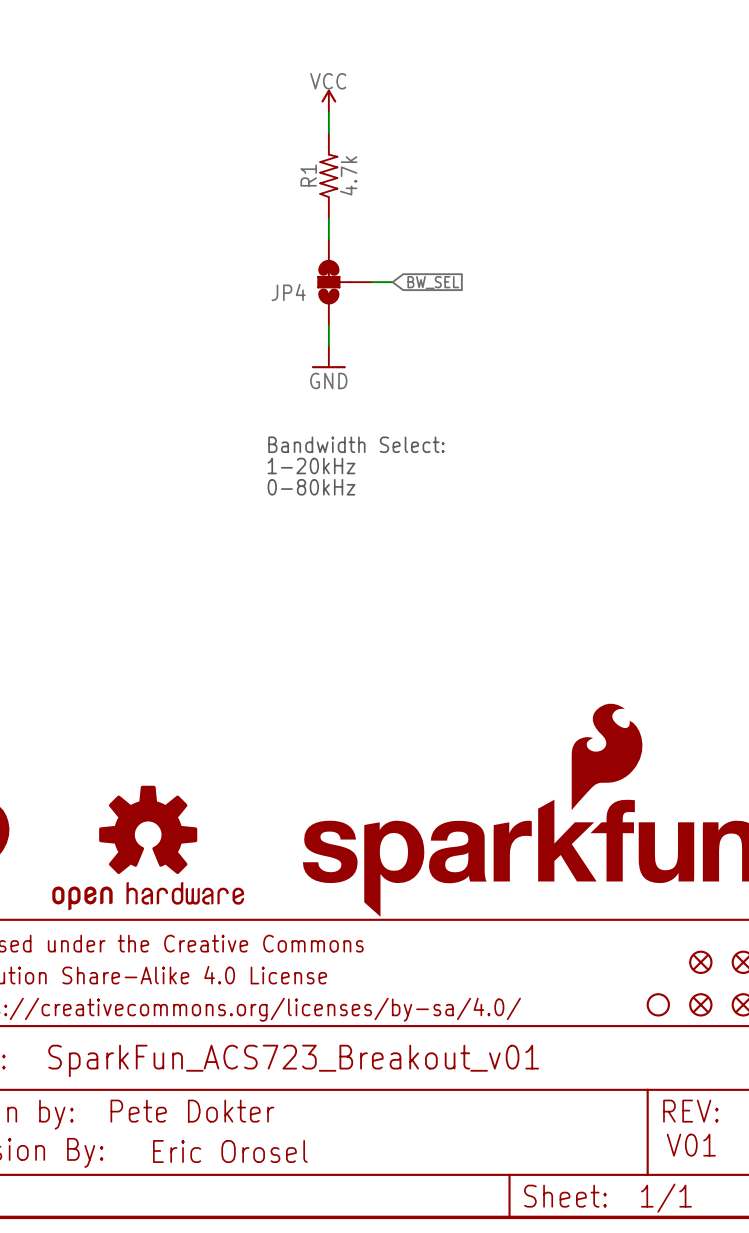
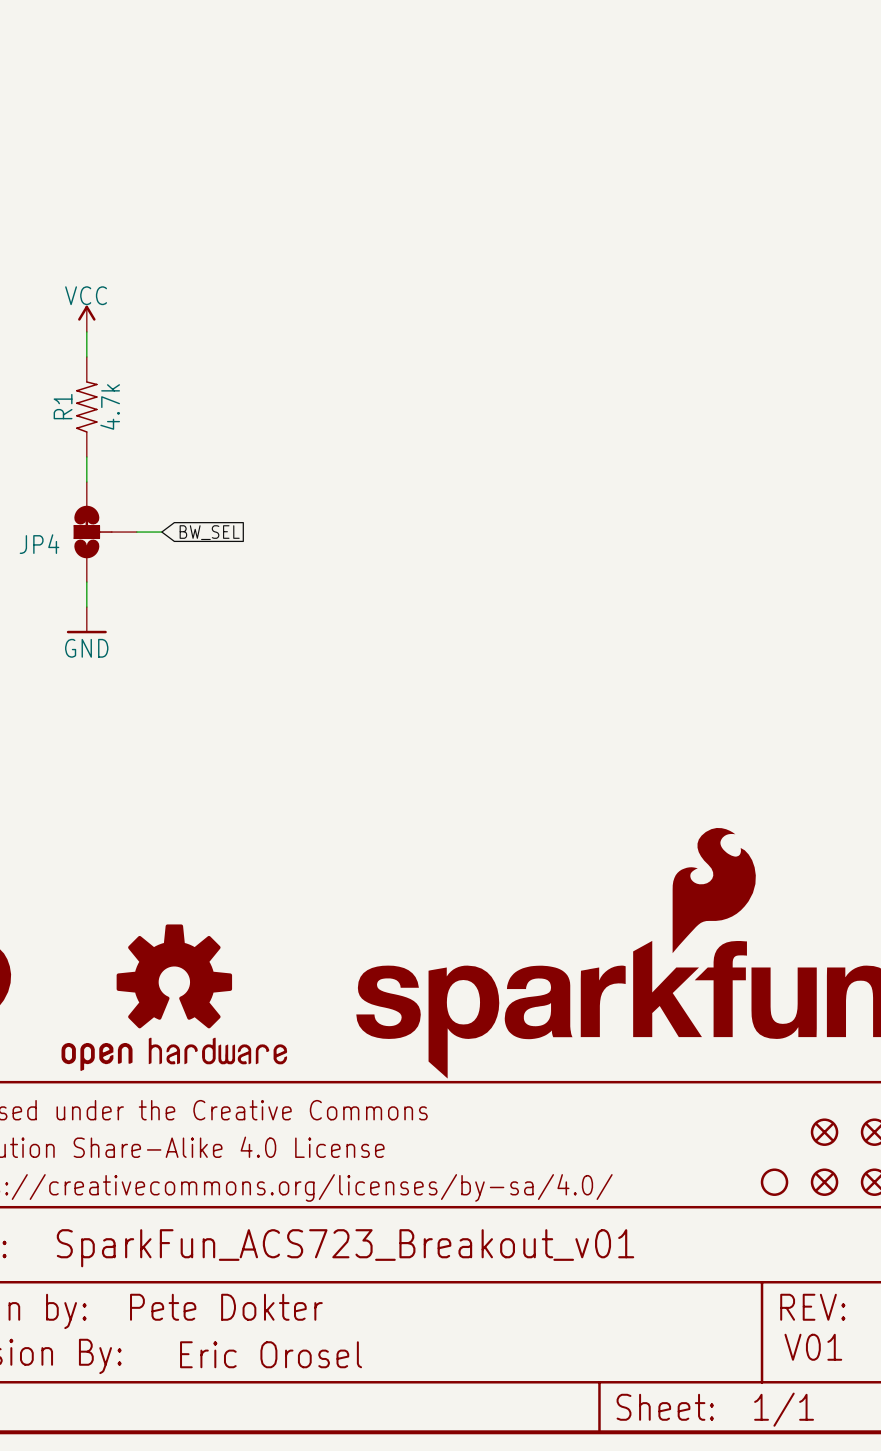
power symbol: VCC (328, 100) -> none
wire: (328, 112) (328, 133) -> none
R1 position: (328, 175) -> (86, 406)
wire: (328, 218) (328, 239) -> none
power symbol: none -> VCC (86, 318)
wire: none -> (86, 331) (86, 356)
JP4 position: (344, 282) -> (105, 532)
wire: (371, 282) (392, 282) -> none
global label: BW_SEL (433, 282) -> none
wire: (328, 324) (328, 345) -> none
power symbol: GND (328, 357) -> none
wire: none -> (86, 457) (86, 482)
text: Bandwidth Select: (356, 444) -> none
wire: none -> (136, 532) (161, 532)
global label: none -> BW_SEL (209, 532)
text: 1-20kHz (311, 466) -> none
text: 0-80kHz (311, 487) -> none
wire: none -> (86, 582) (86, 607)
power symbol: none -> GND (86, 620)

